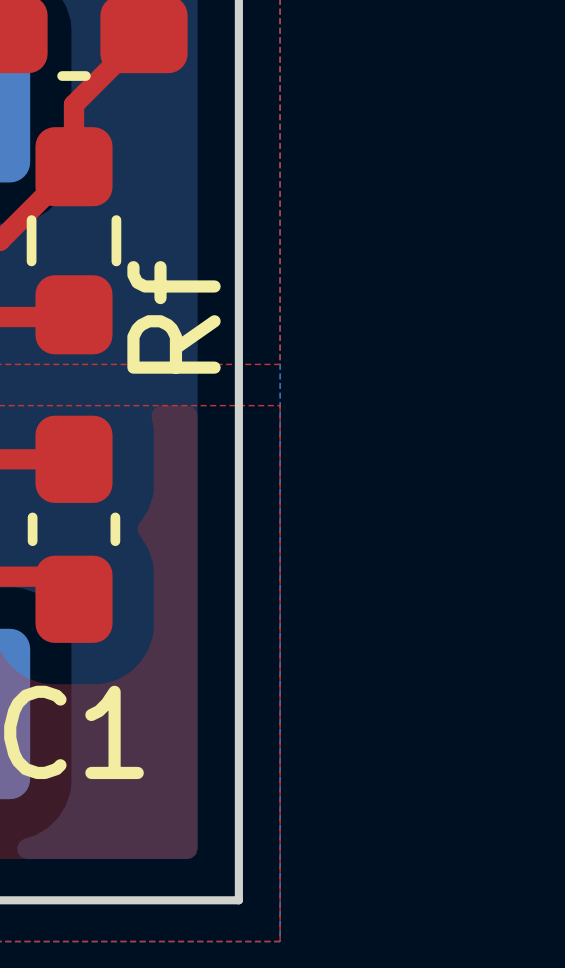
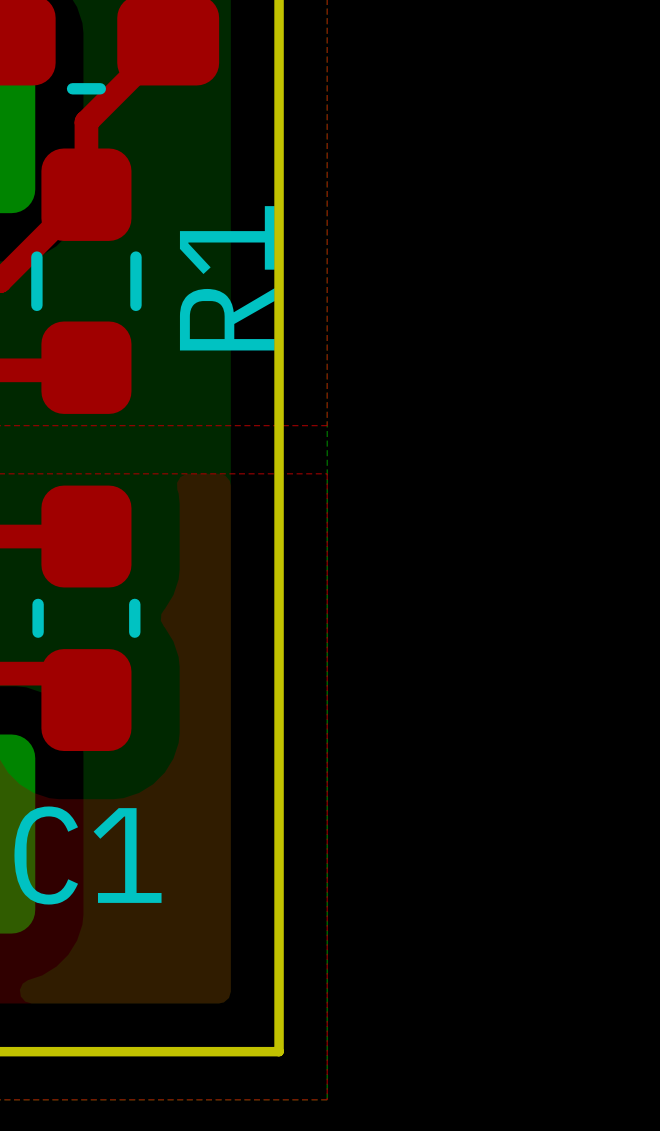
Rf name: Rf (174, 317) -> R1 (227, 278)

